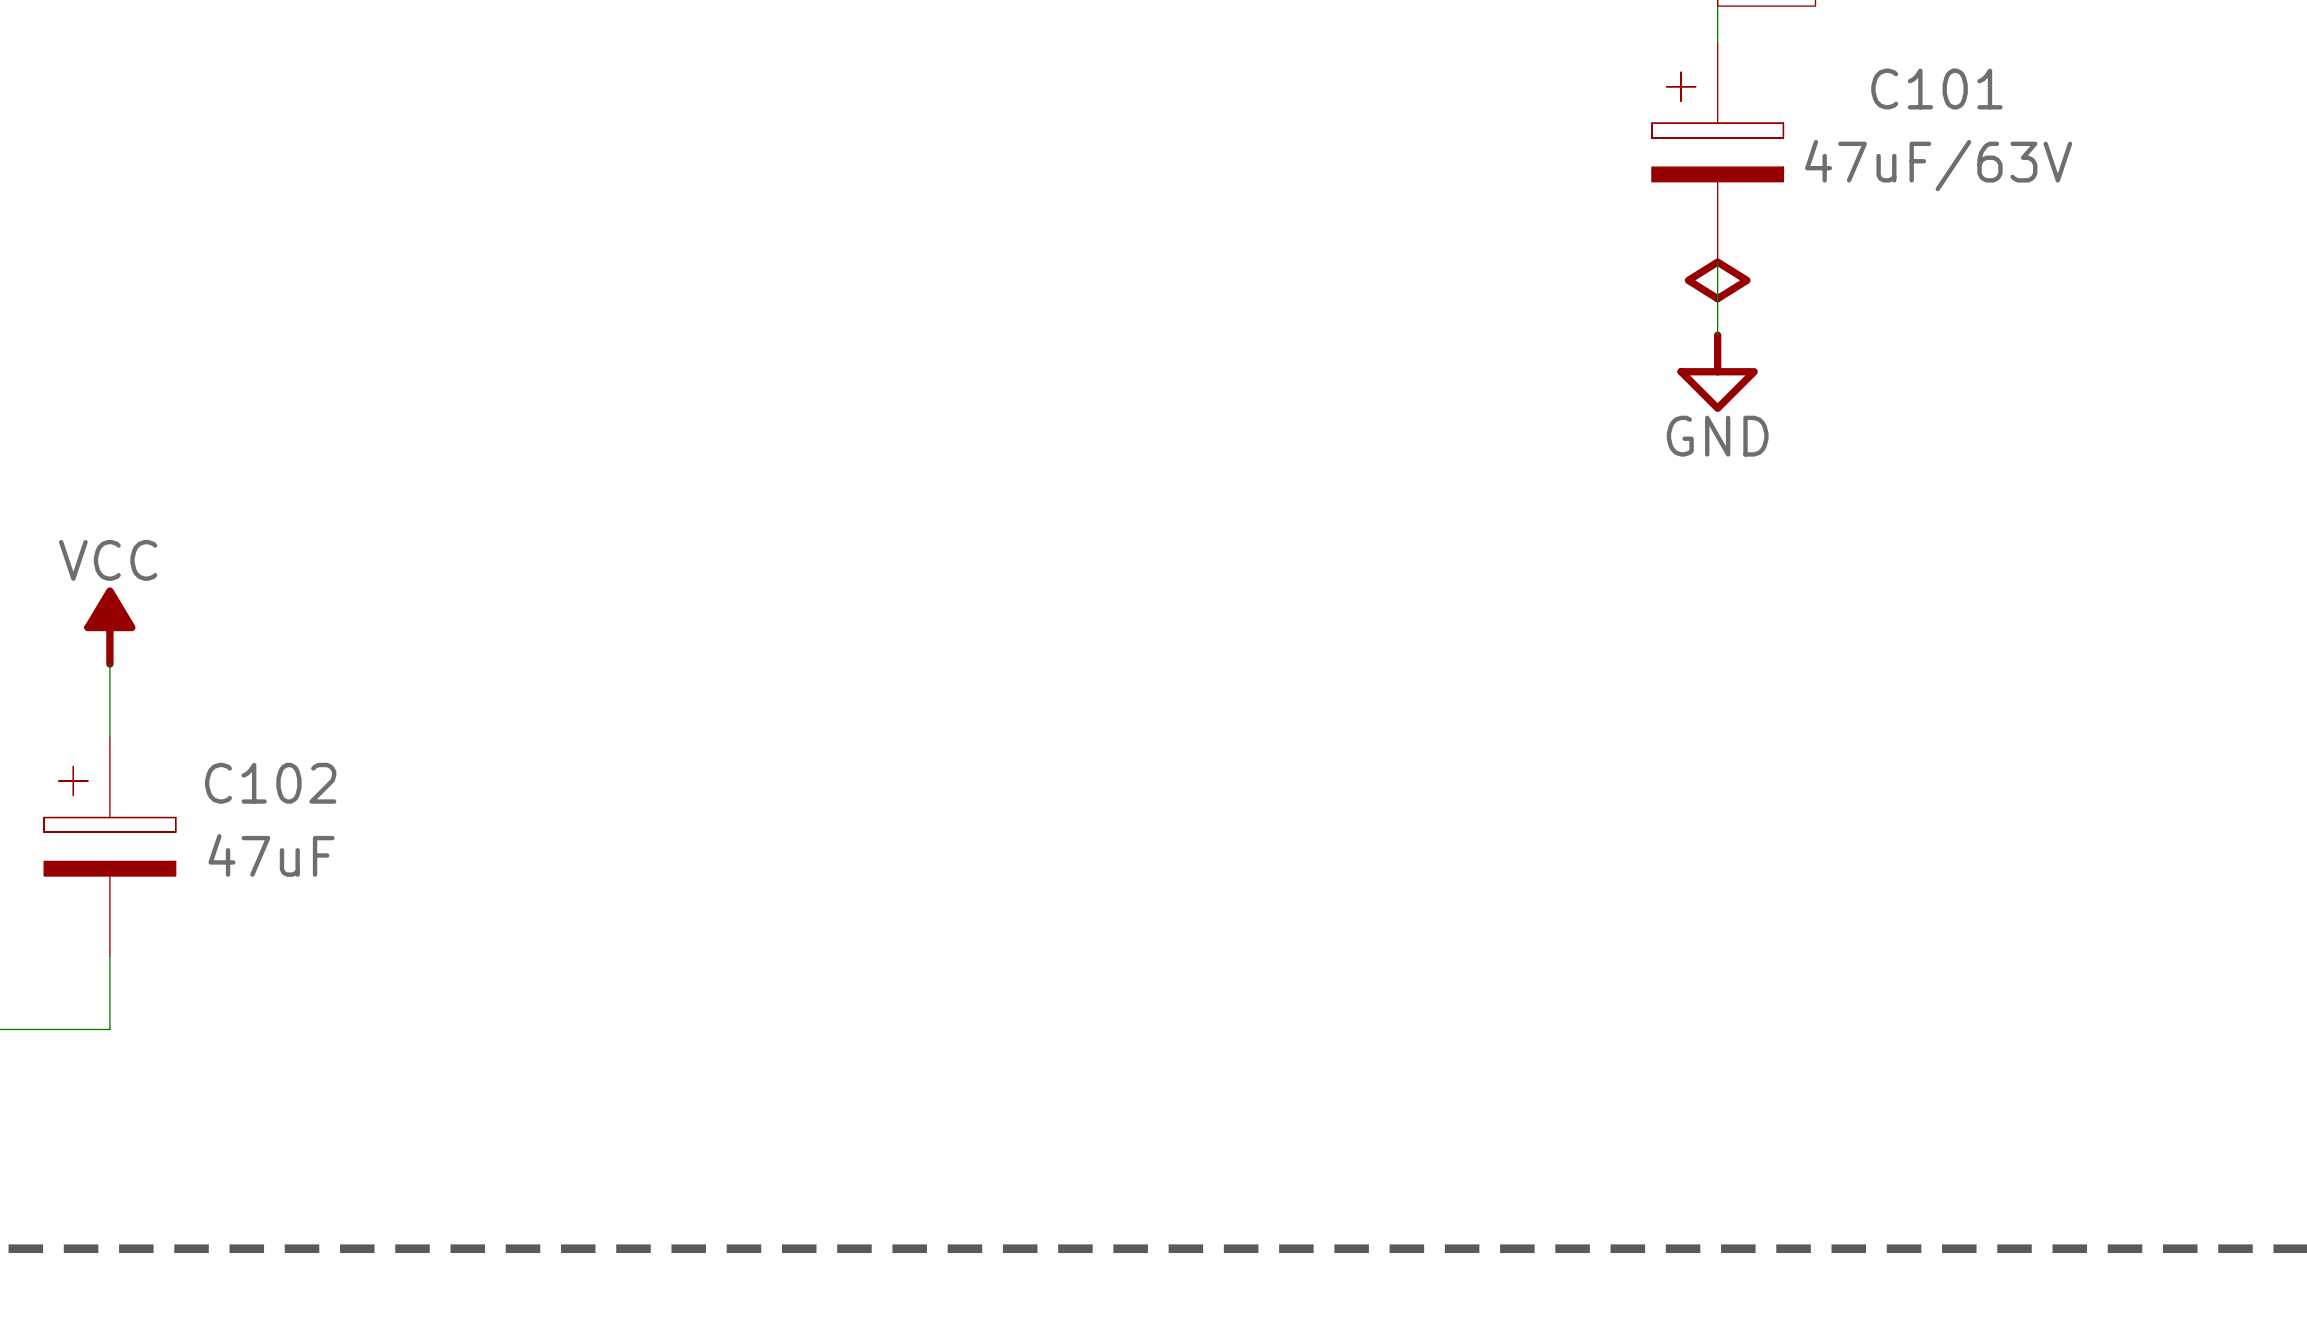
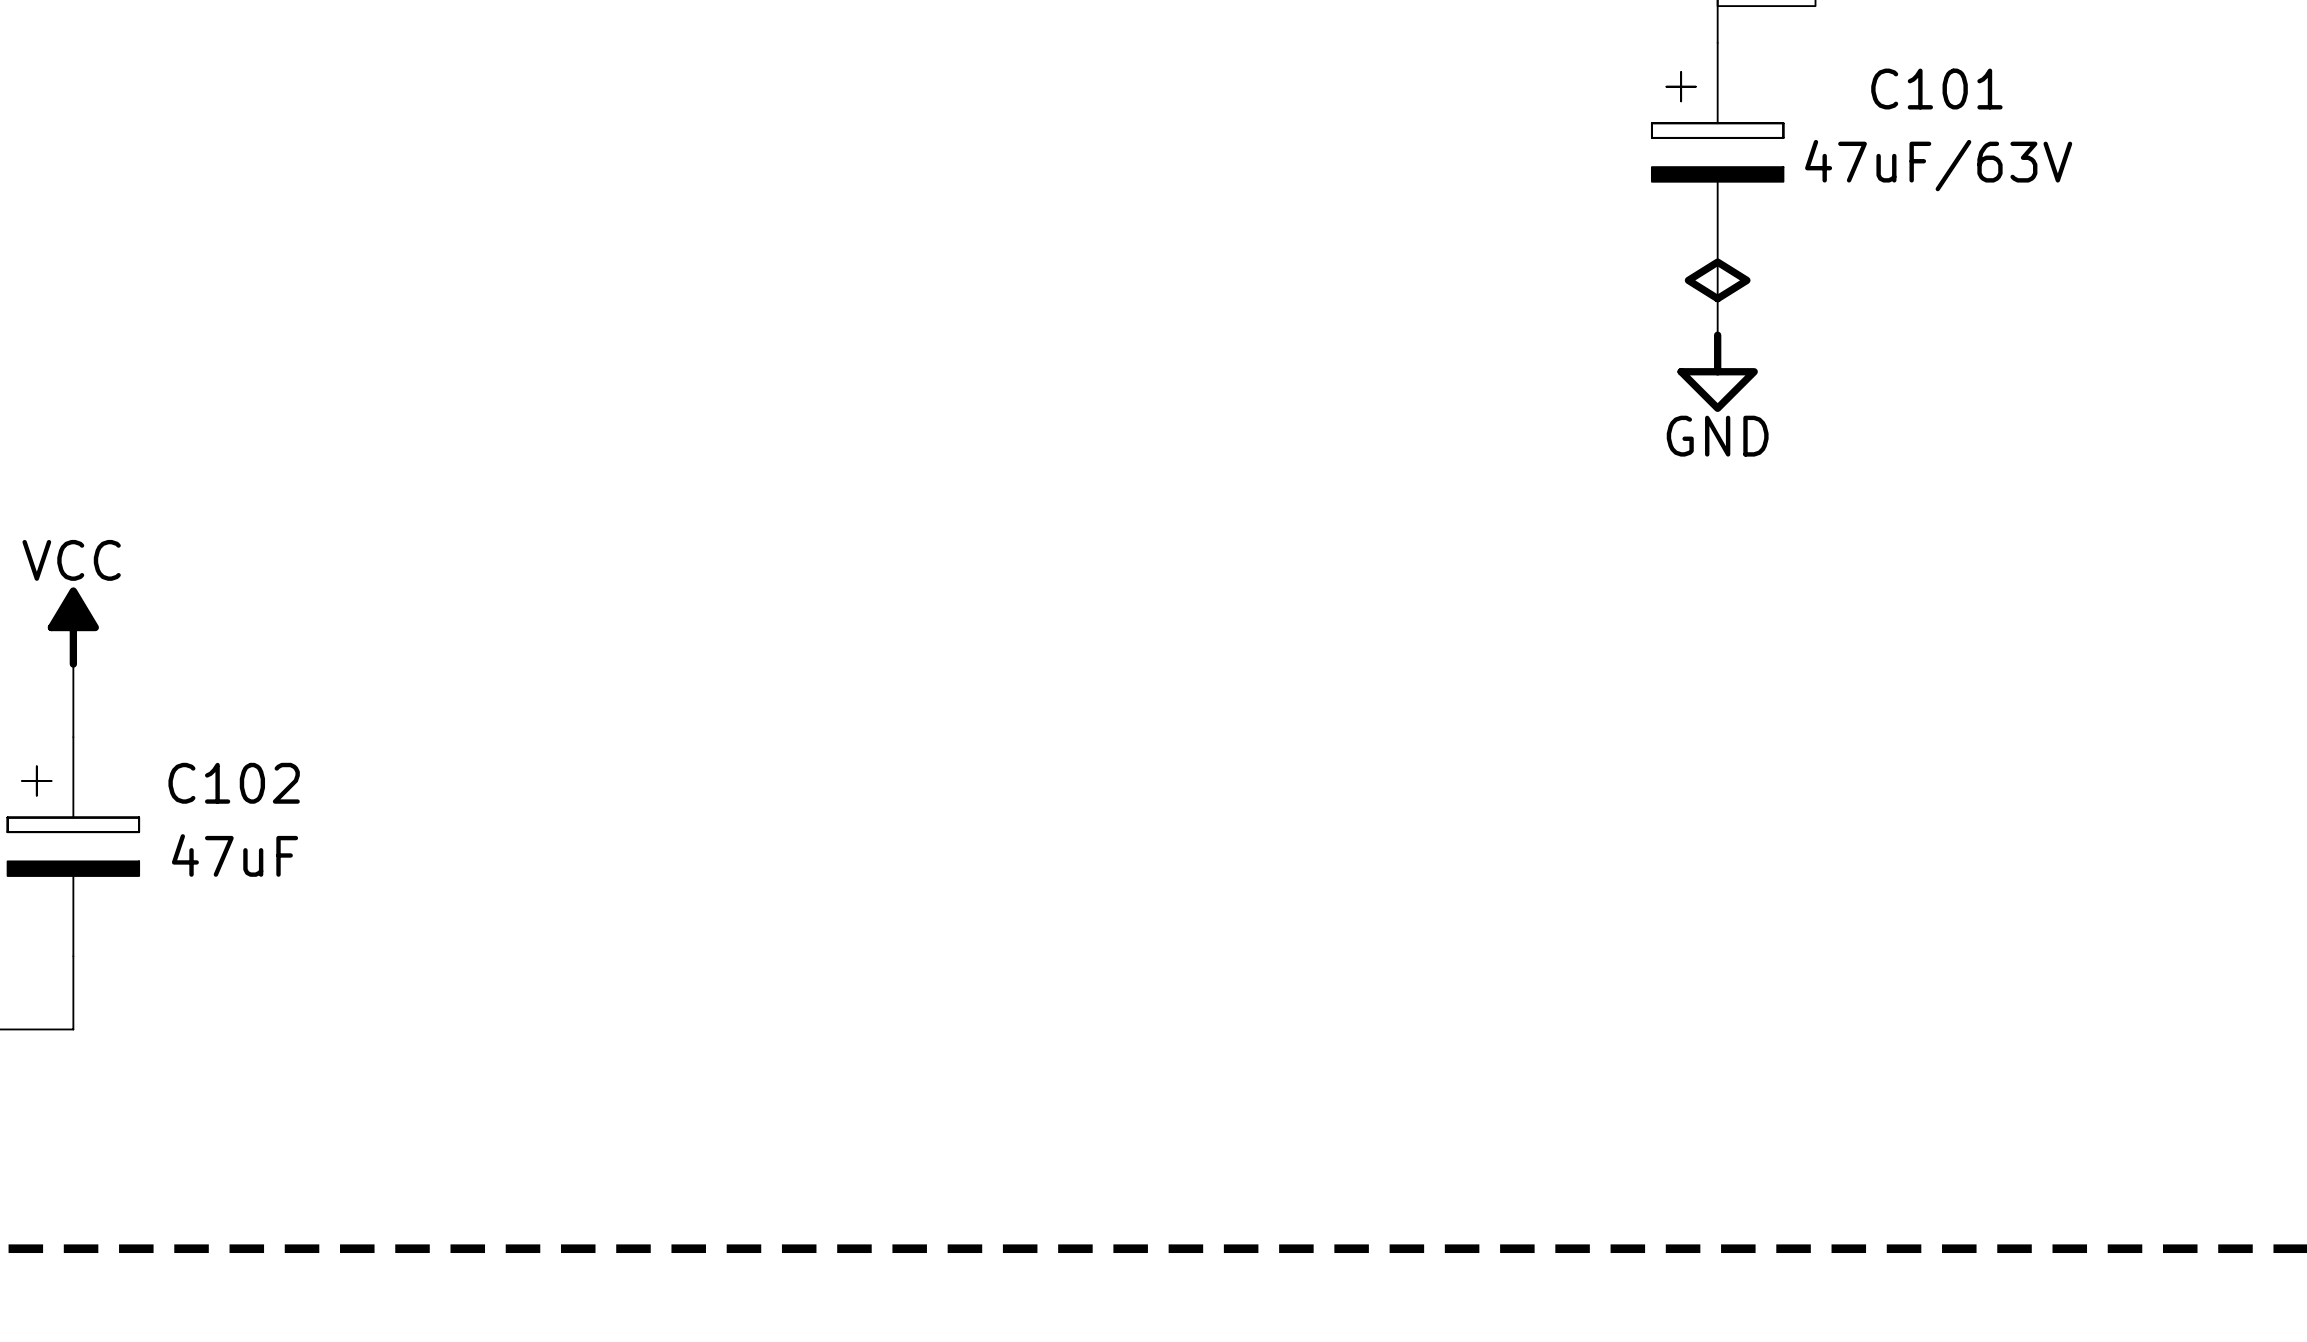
power symbol position: VCC (109, 627) -> VCC (73, 627)
wire: (109, 664) (109, 737) -> (73, 664) (73, 737)
C102 position: (109, 846) -> (73, 846)
wire: (109, 956) (109, 1029) (73, 1029) -> (73, 956) (73, 1029)

